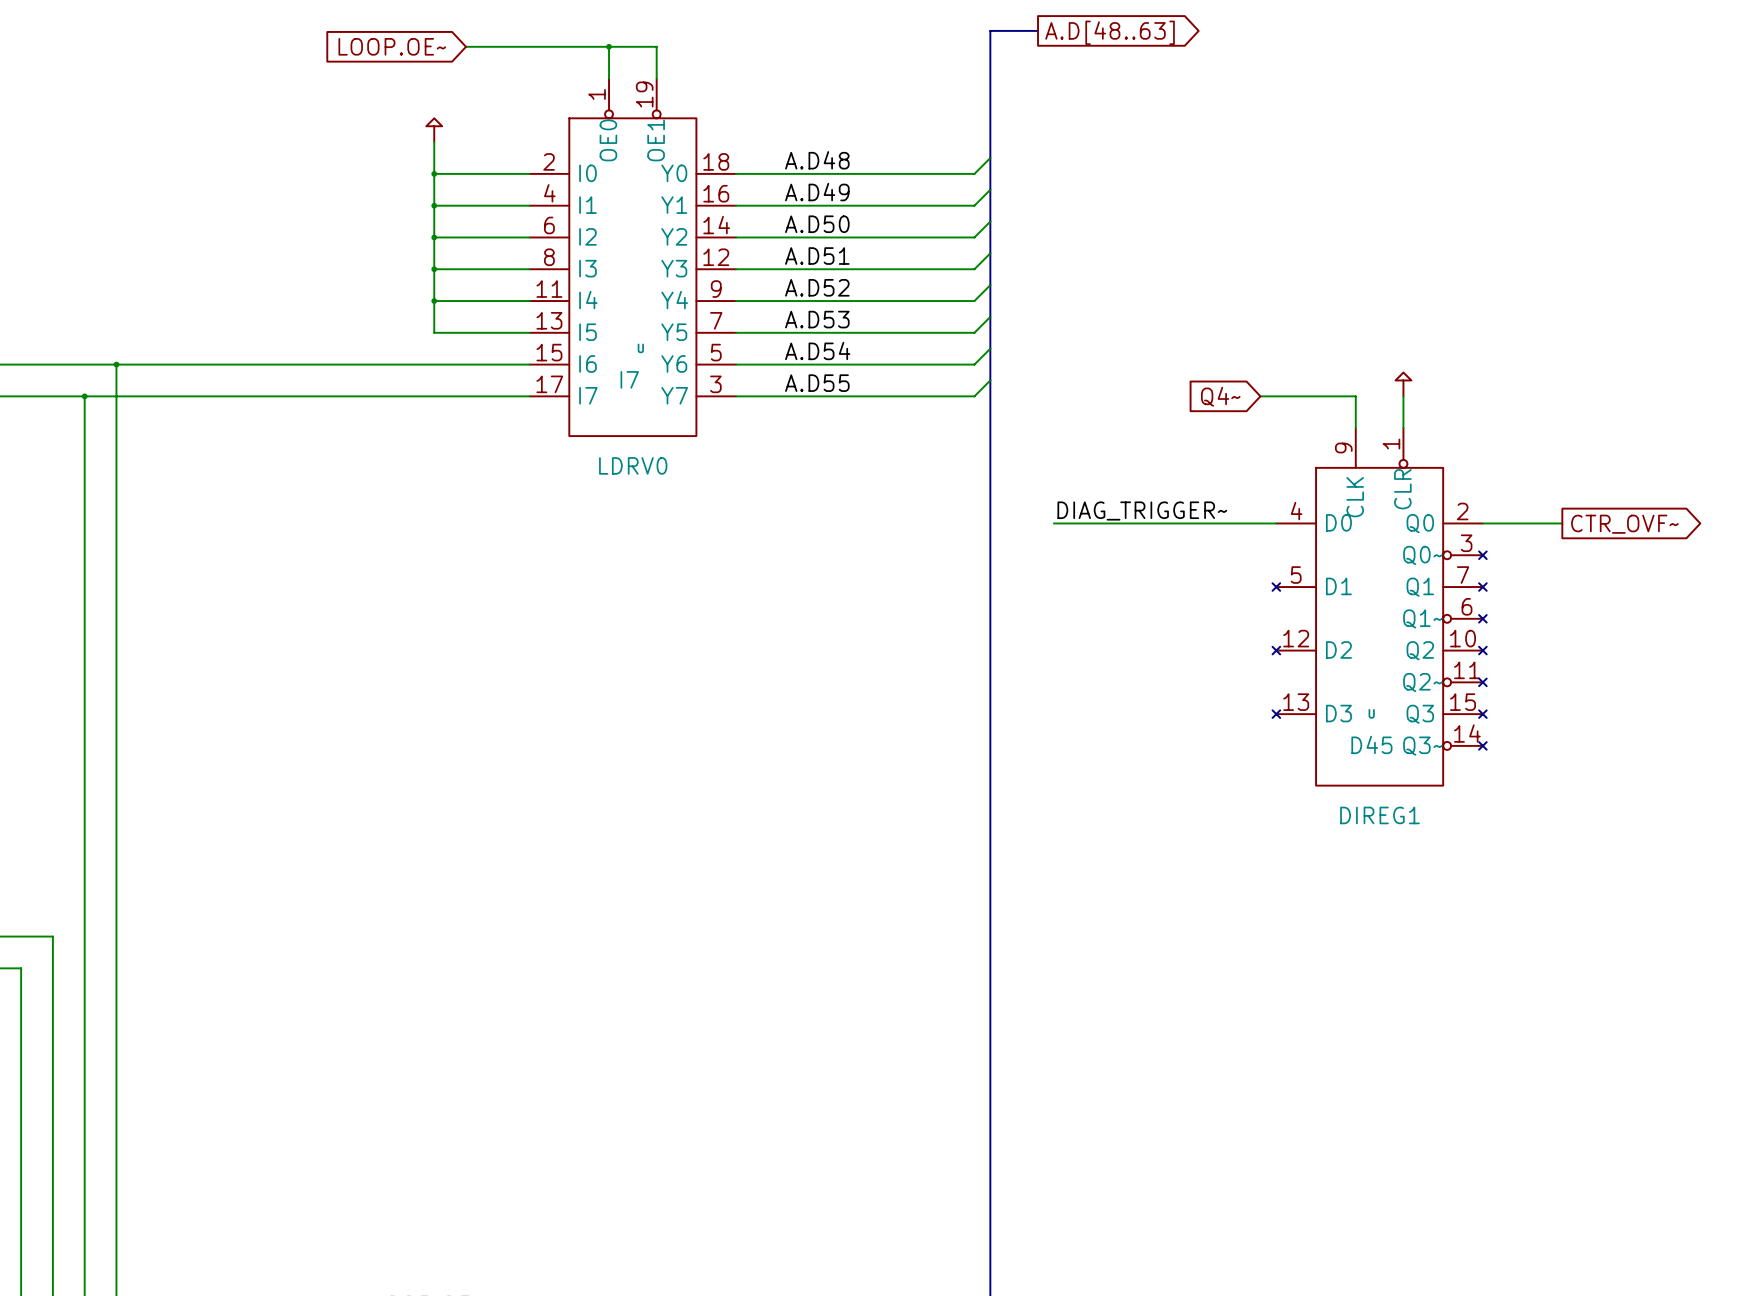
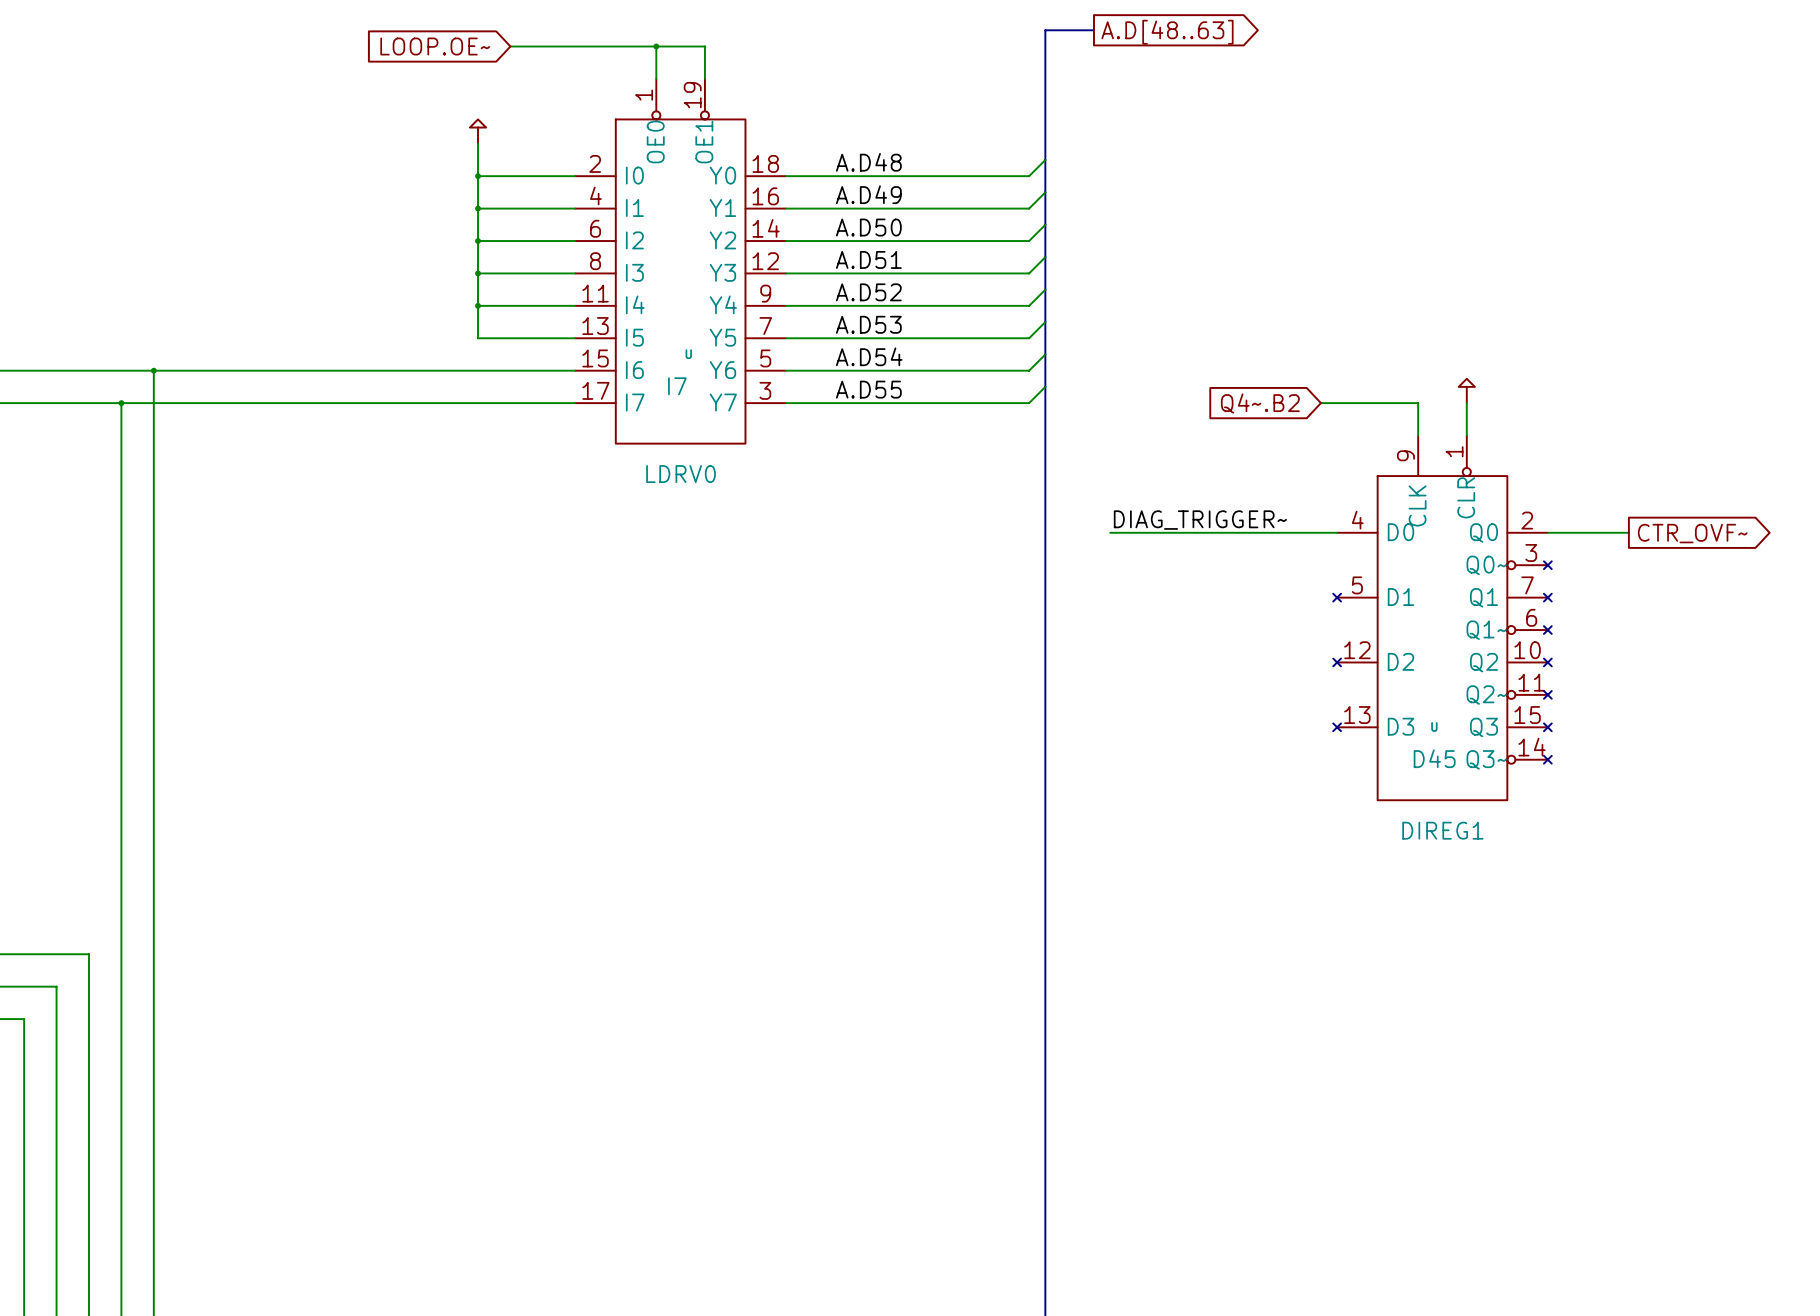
global label: Q4~ (1220, 396) -> Q4~.B2 (1260, 403)

